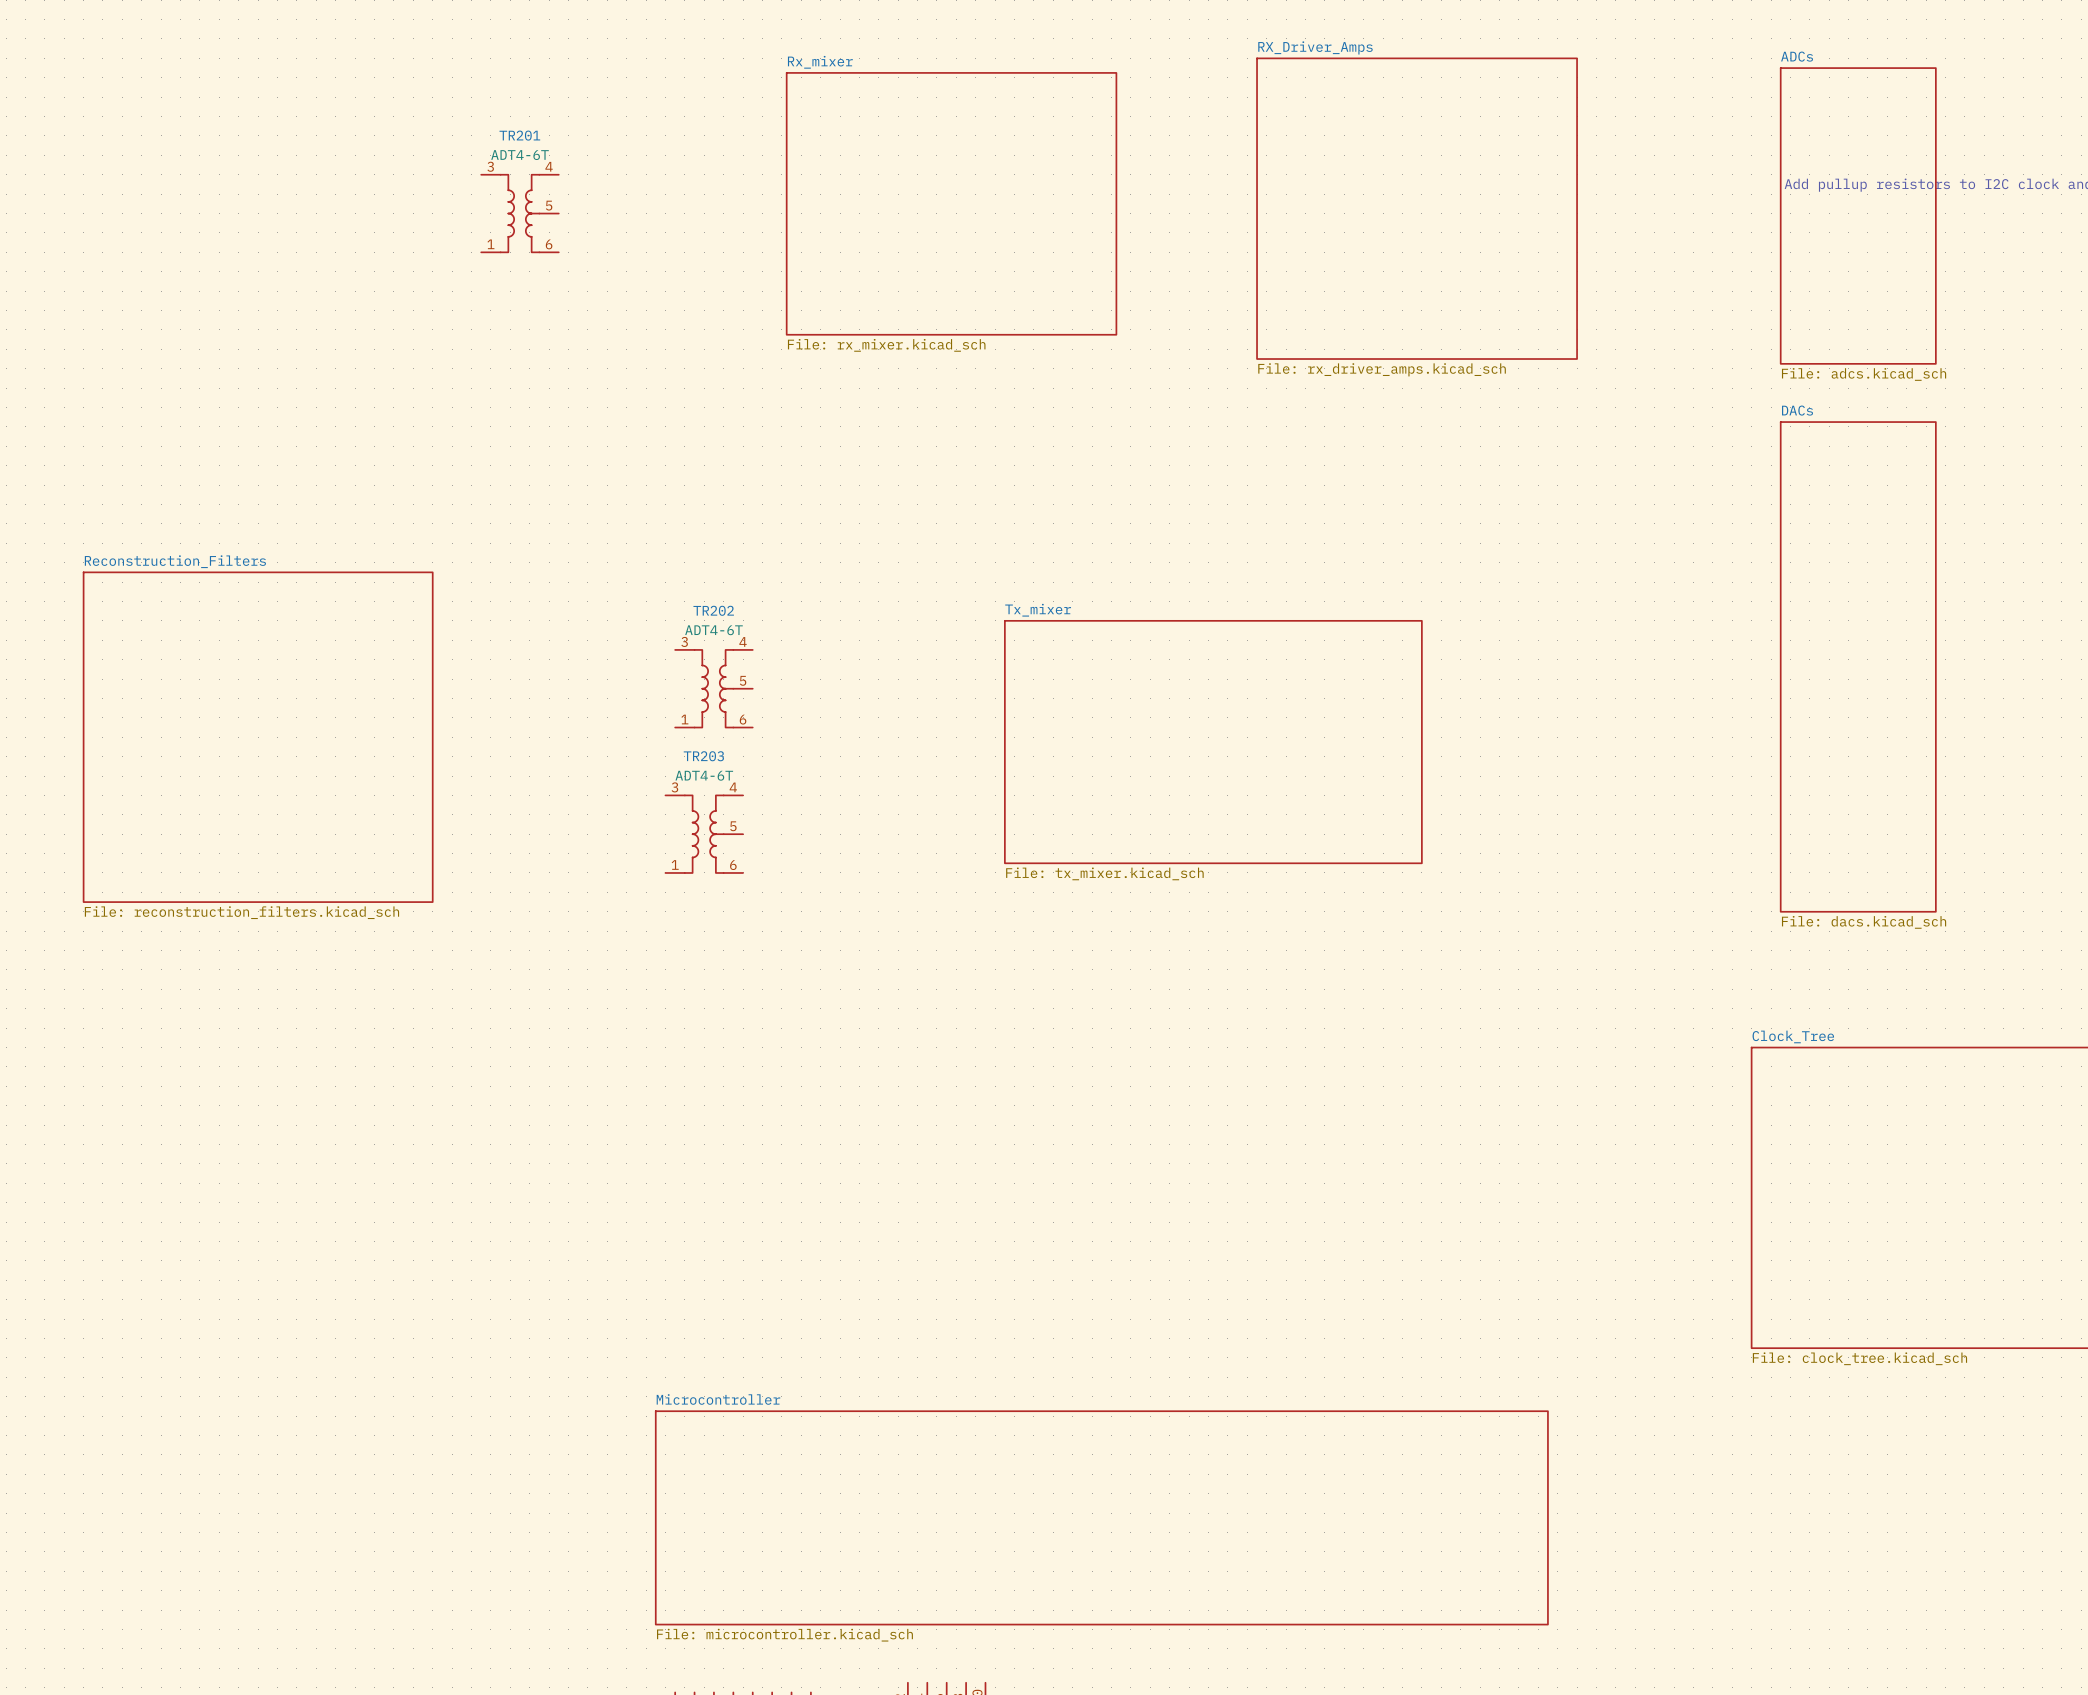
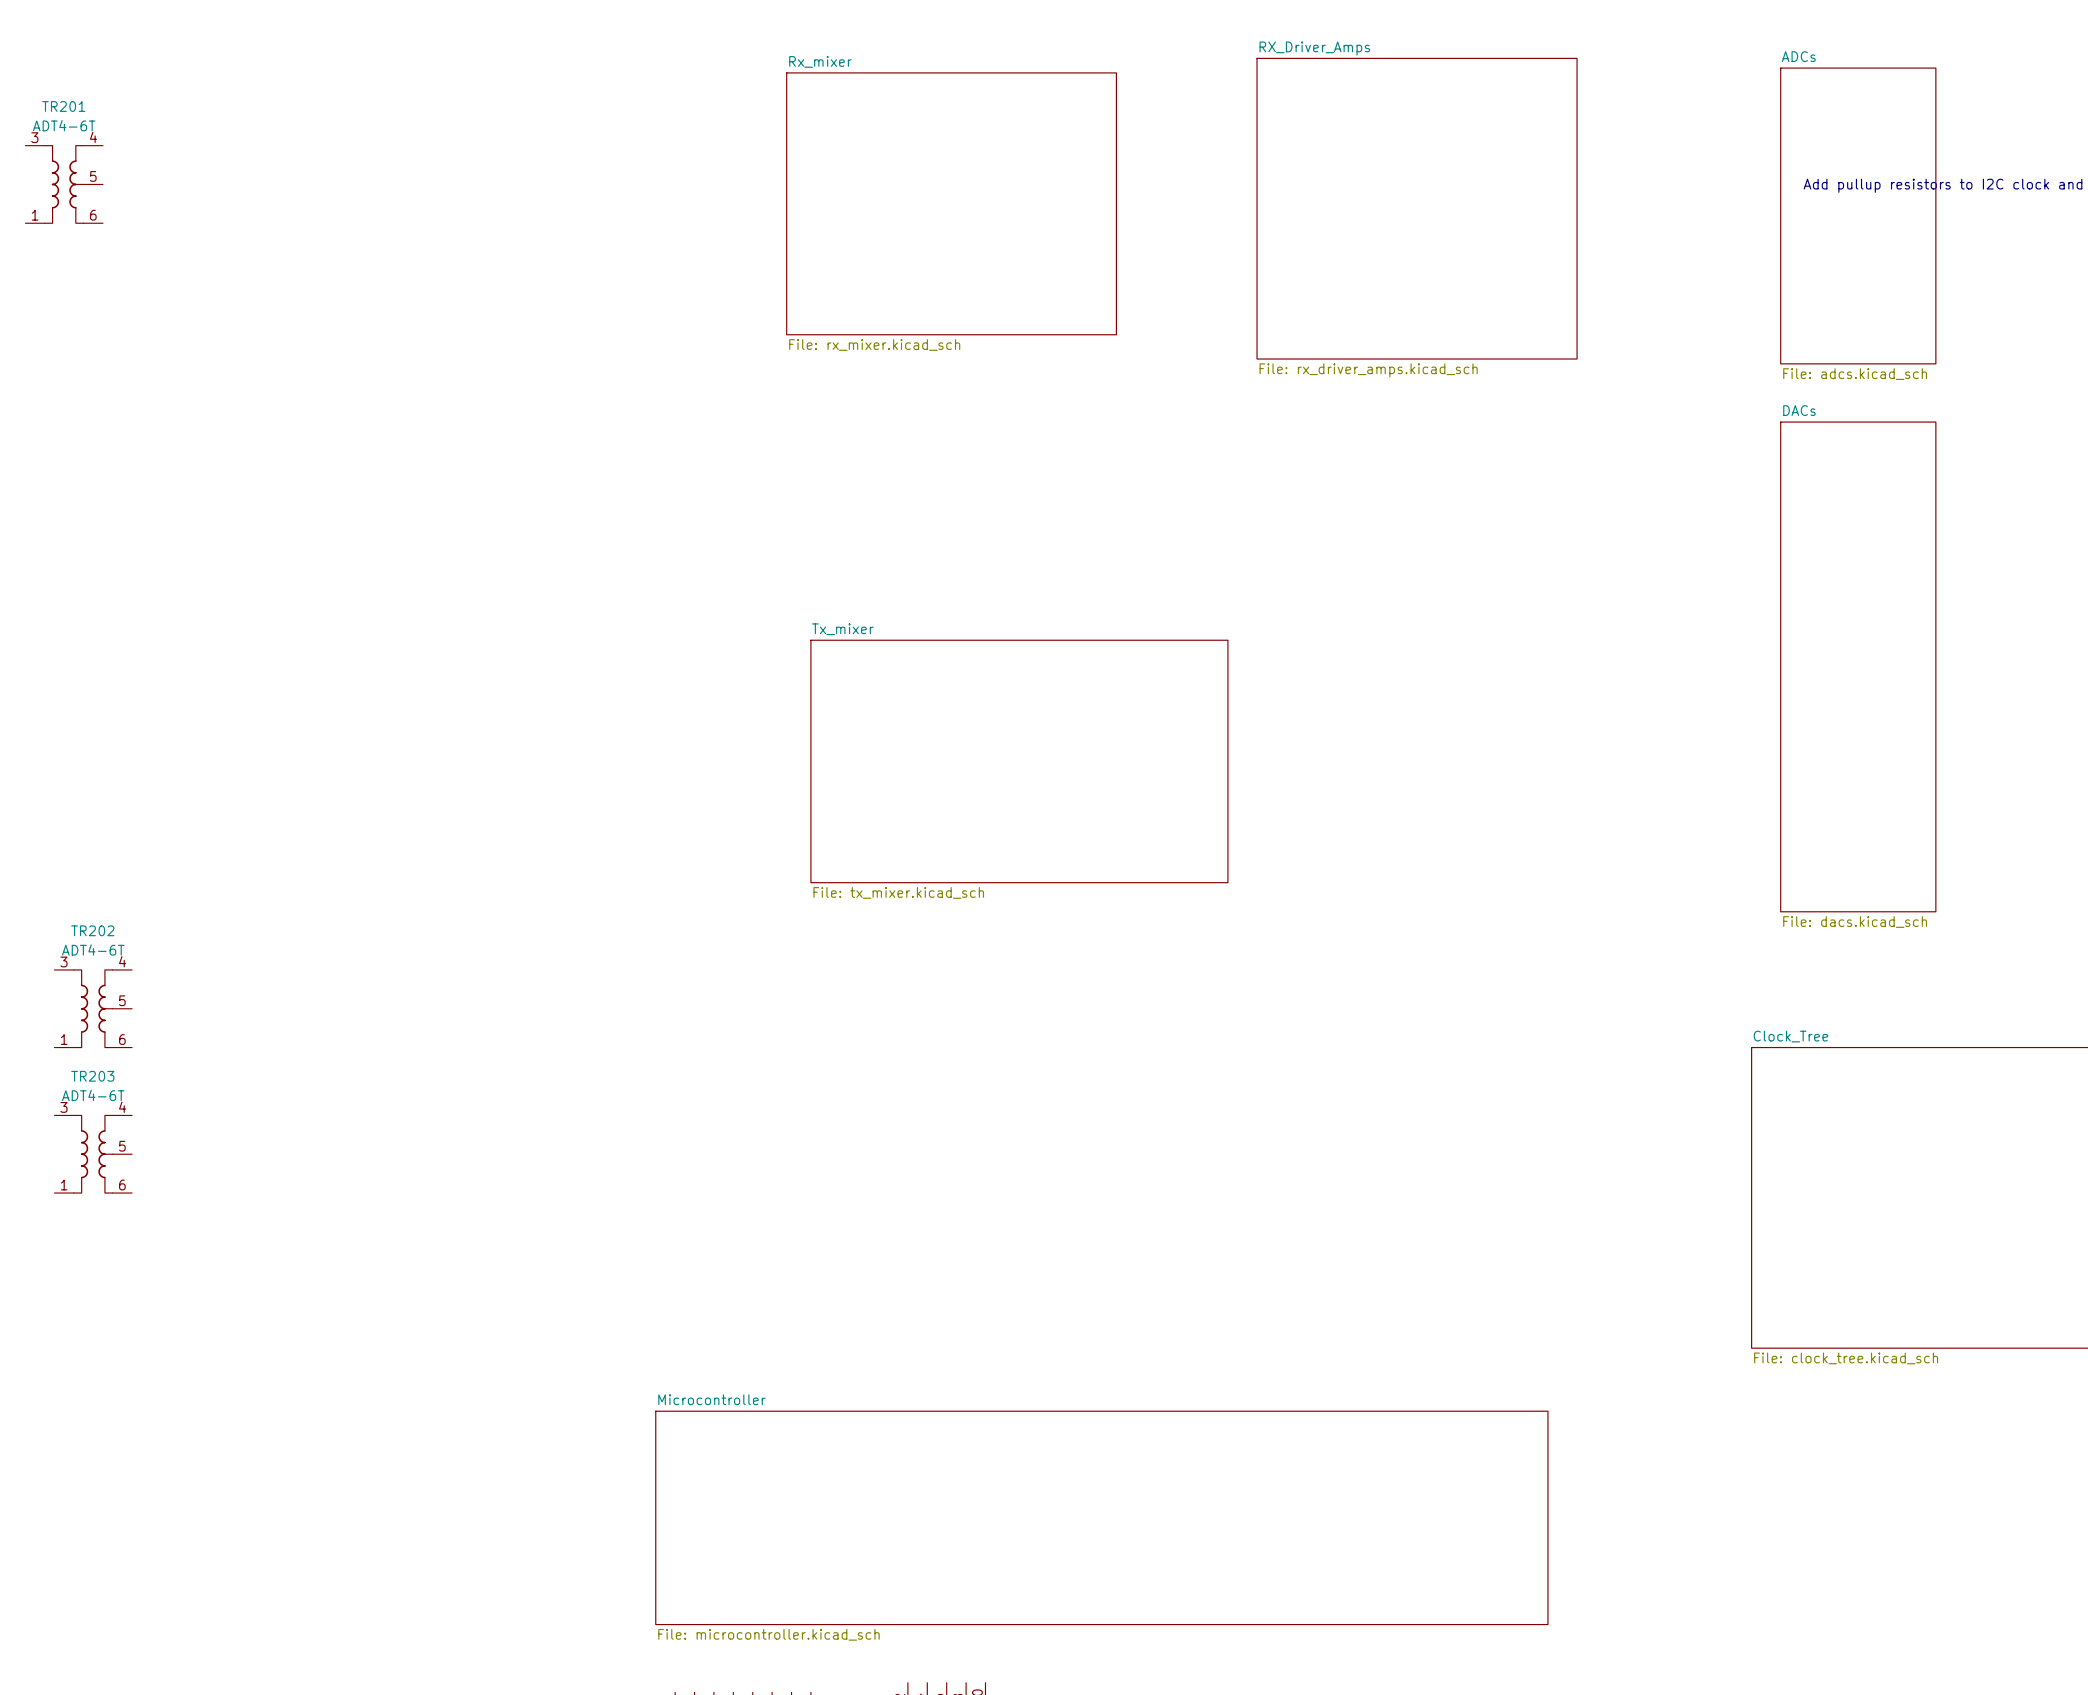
TR201 position: (519, 213) -> (64, 184)
TR202 position: (713, 688) -> (93, 1008)
sheet Reconstruction_Filters: File: reconstruction_filters.kicad_sch (258, 737) -> none
sheet Tx_mixer: File: tx_mixer.kicad_sch (1213, 742) -> none
sheet Tx_mixer: none -> File: tx_mixer.kicad_sch (1019, 761)
TR203 position: (704, 834) -> (93, 1154)

